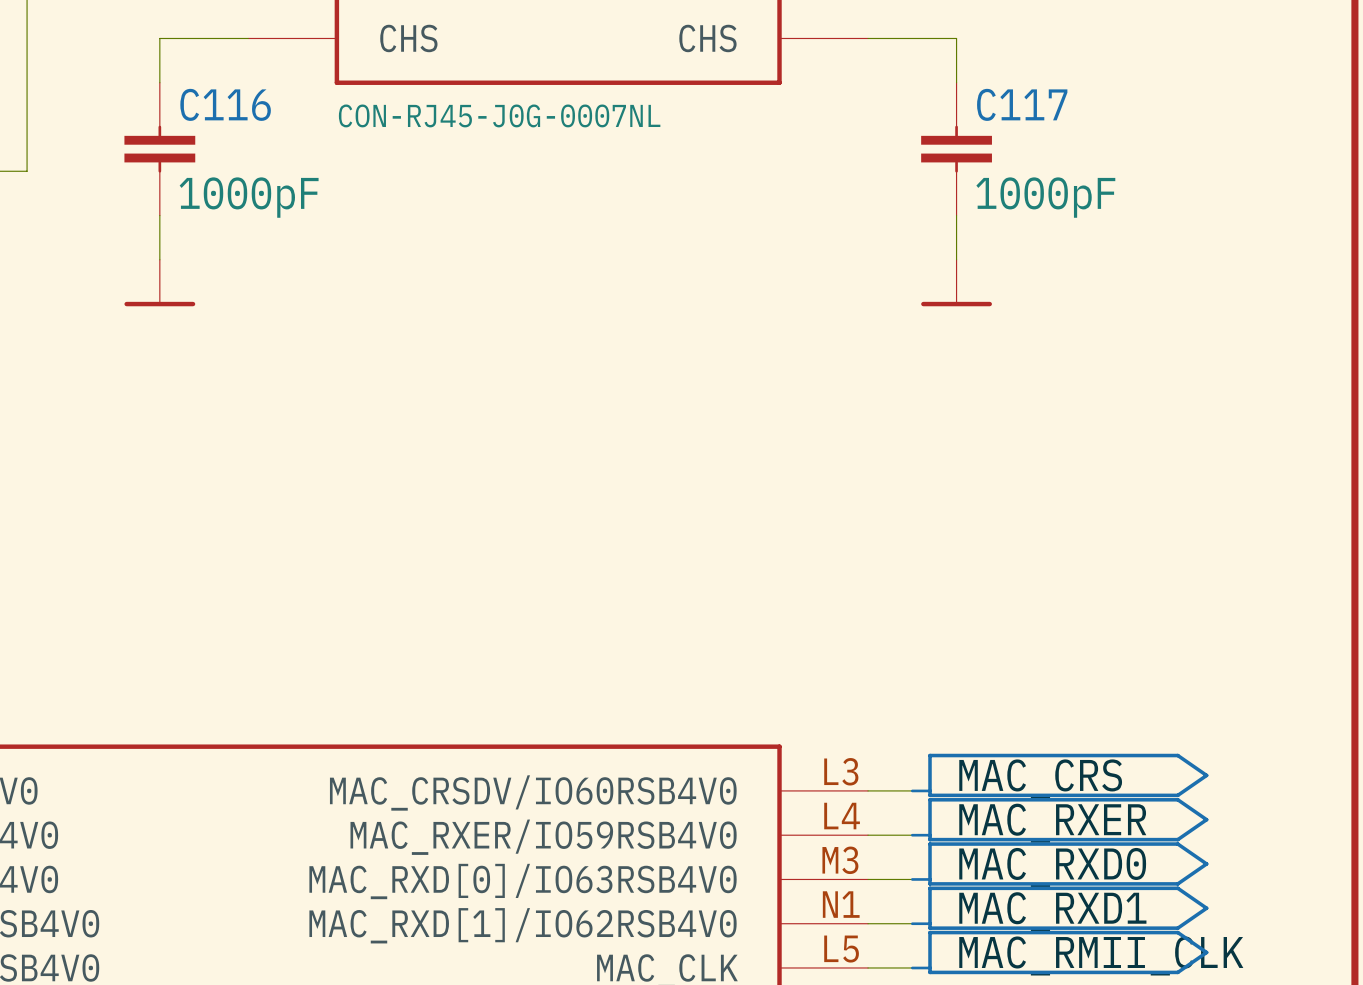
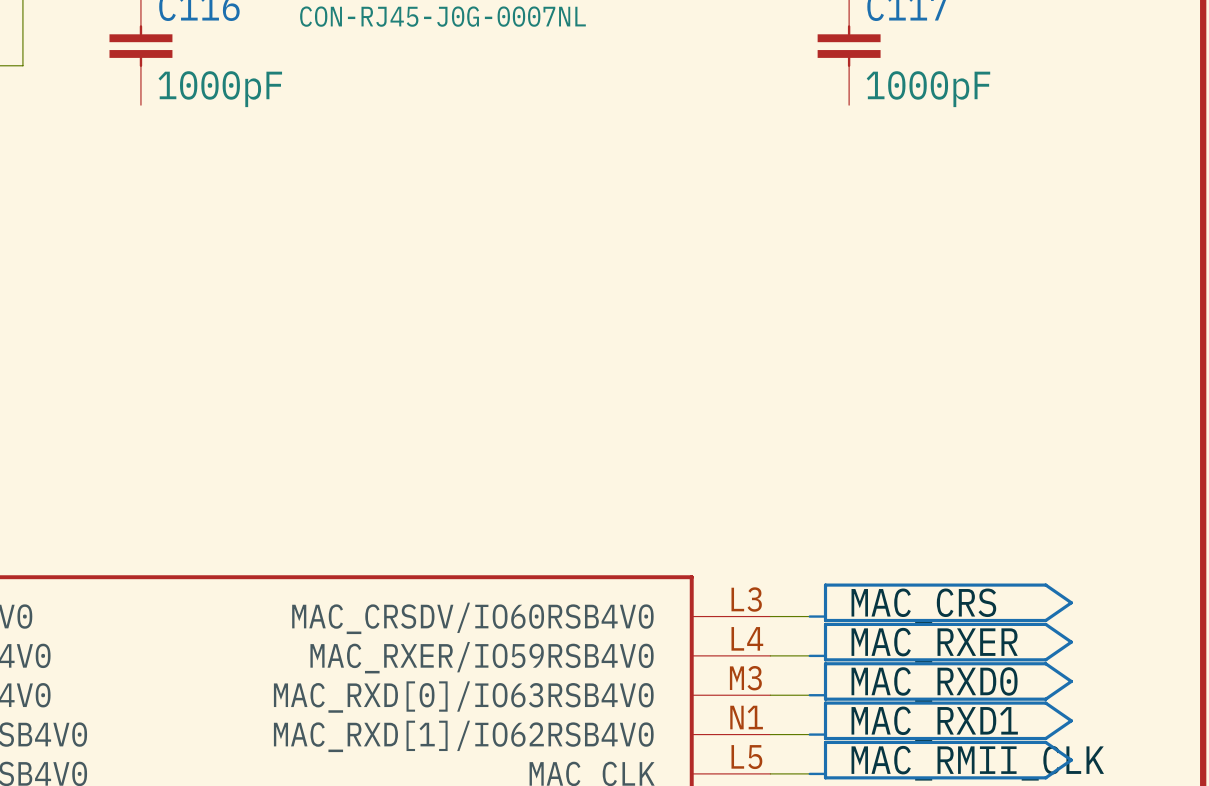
wire: (159, 215) (159, 259) -> none
wire: (956, 215) (956, 259) -> none
power symbol: (159, 283) -> none
power symbol: (956, 283) -> none

